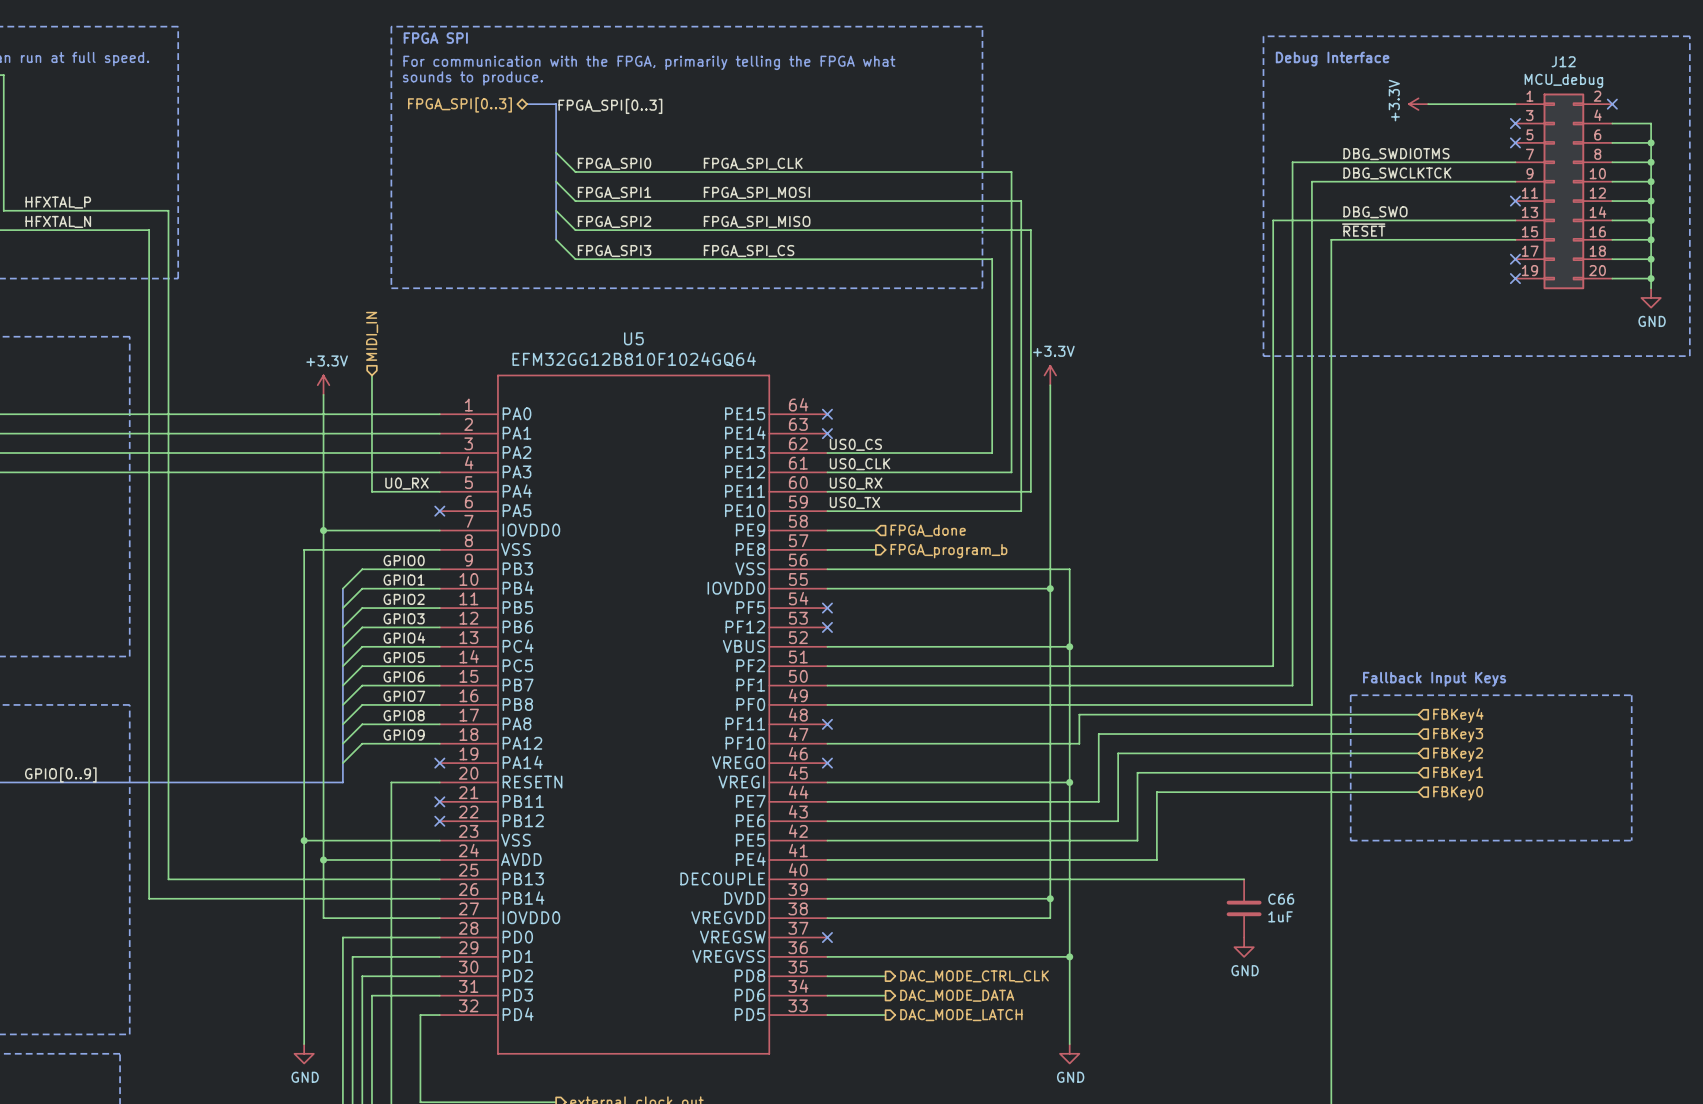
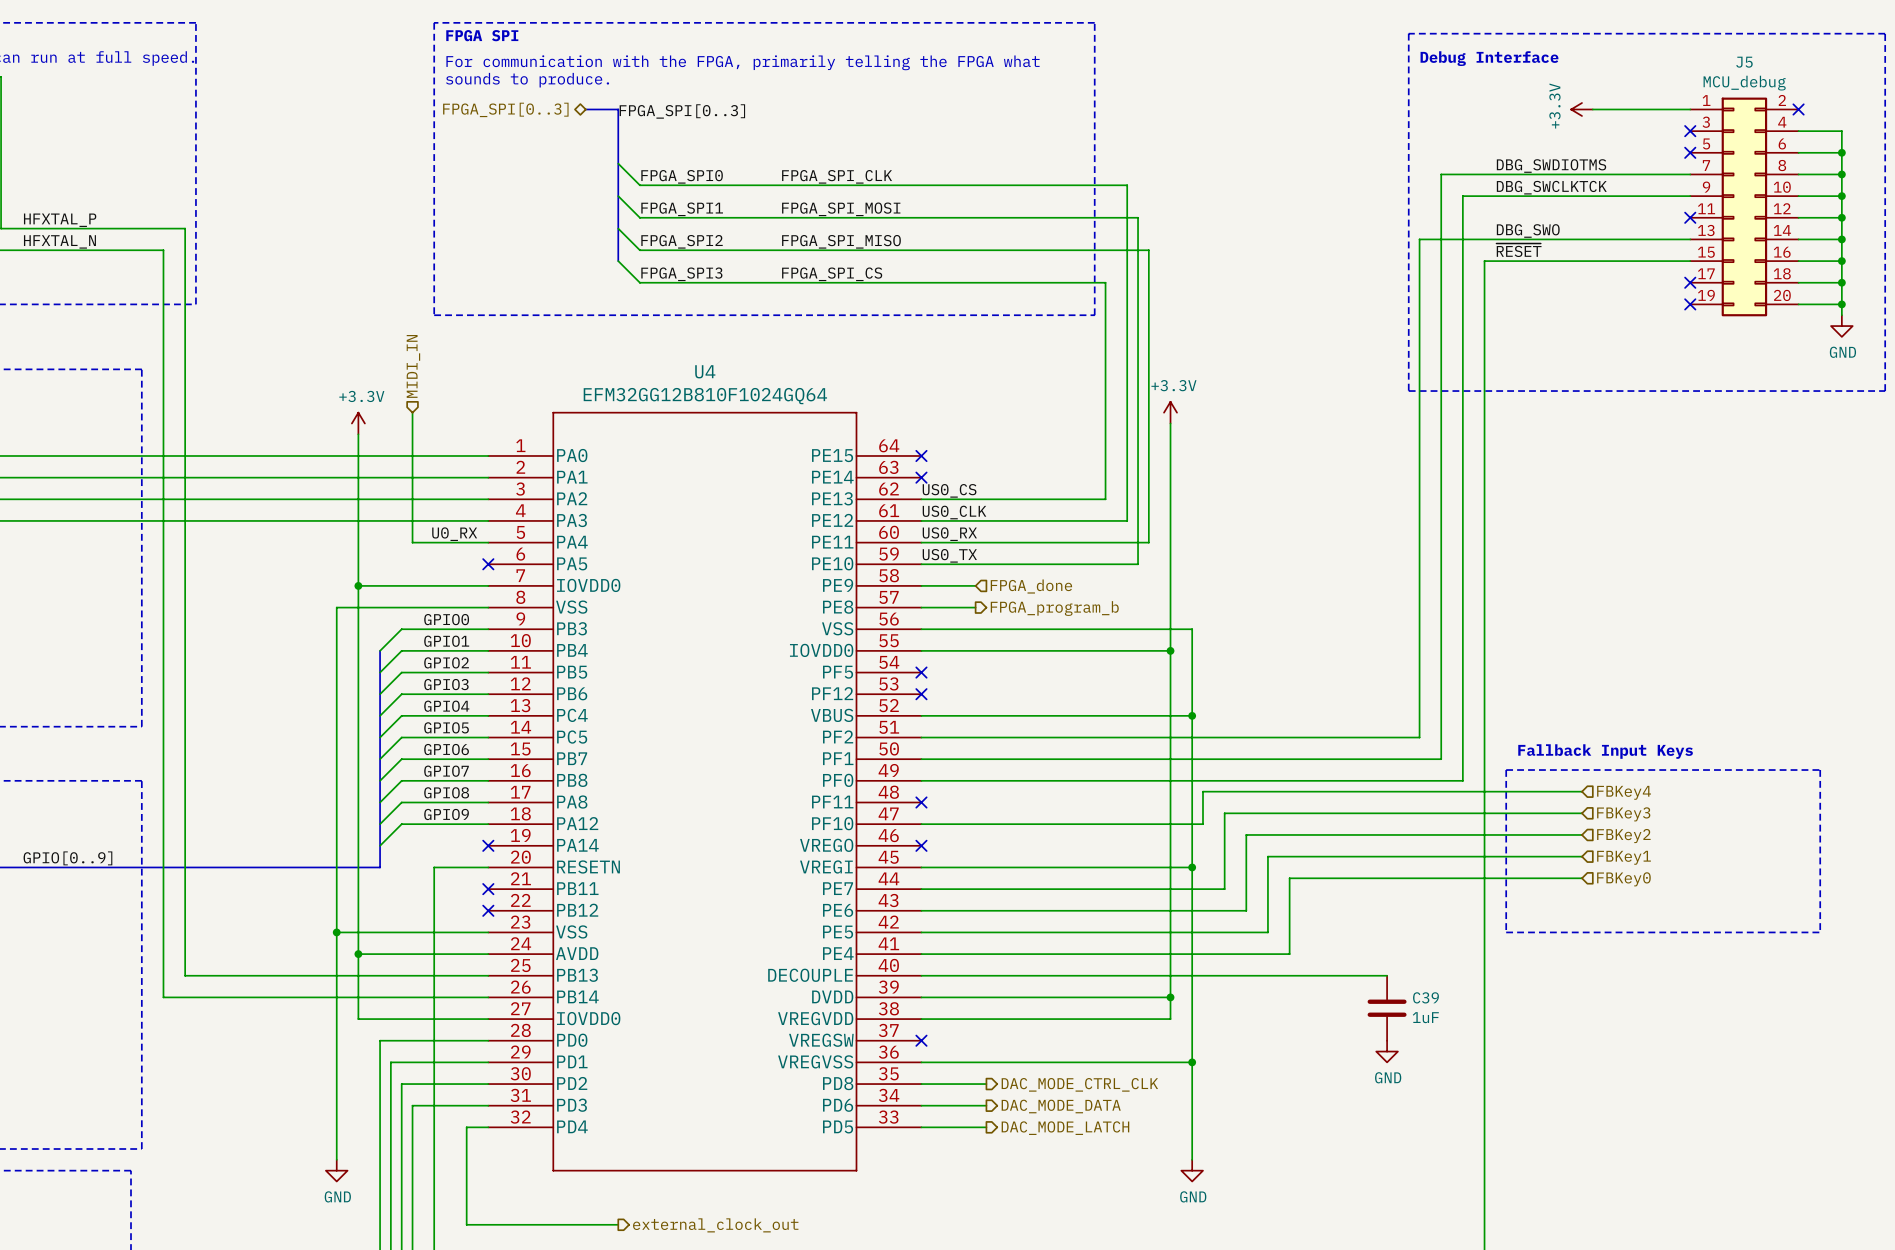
J12 name: J12 (1563, 61) -> J5 (1744, 62)
U5 name: U5 (633, 338) -> U4 (705, 371)
C66 name: C66 (1281, 899) -> C39 (1425, 997)

